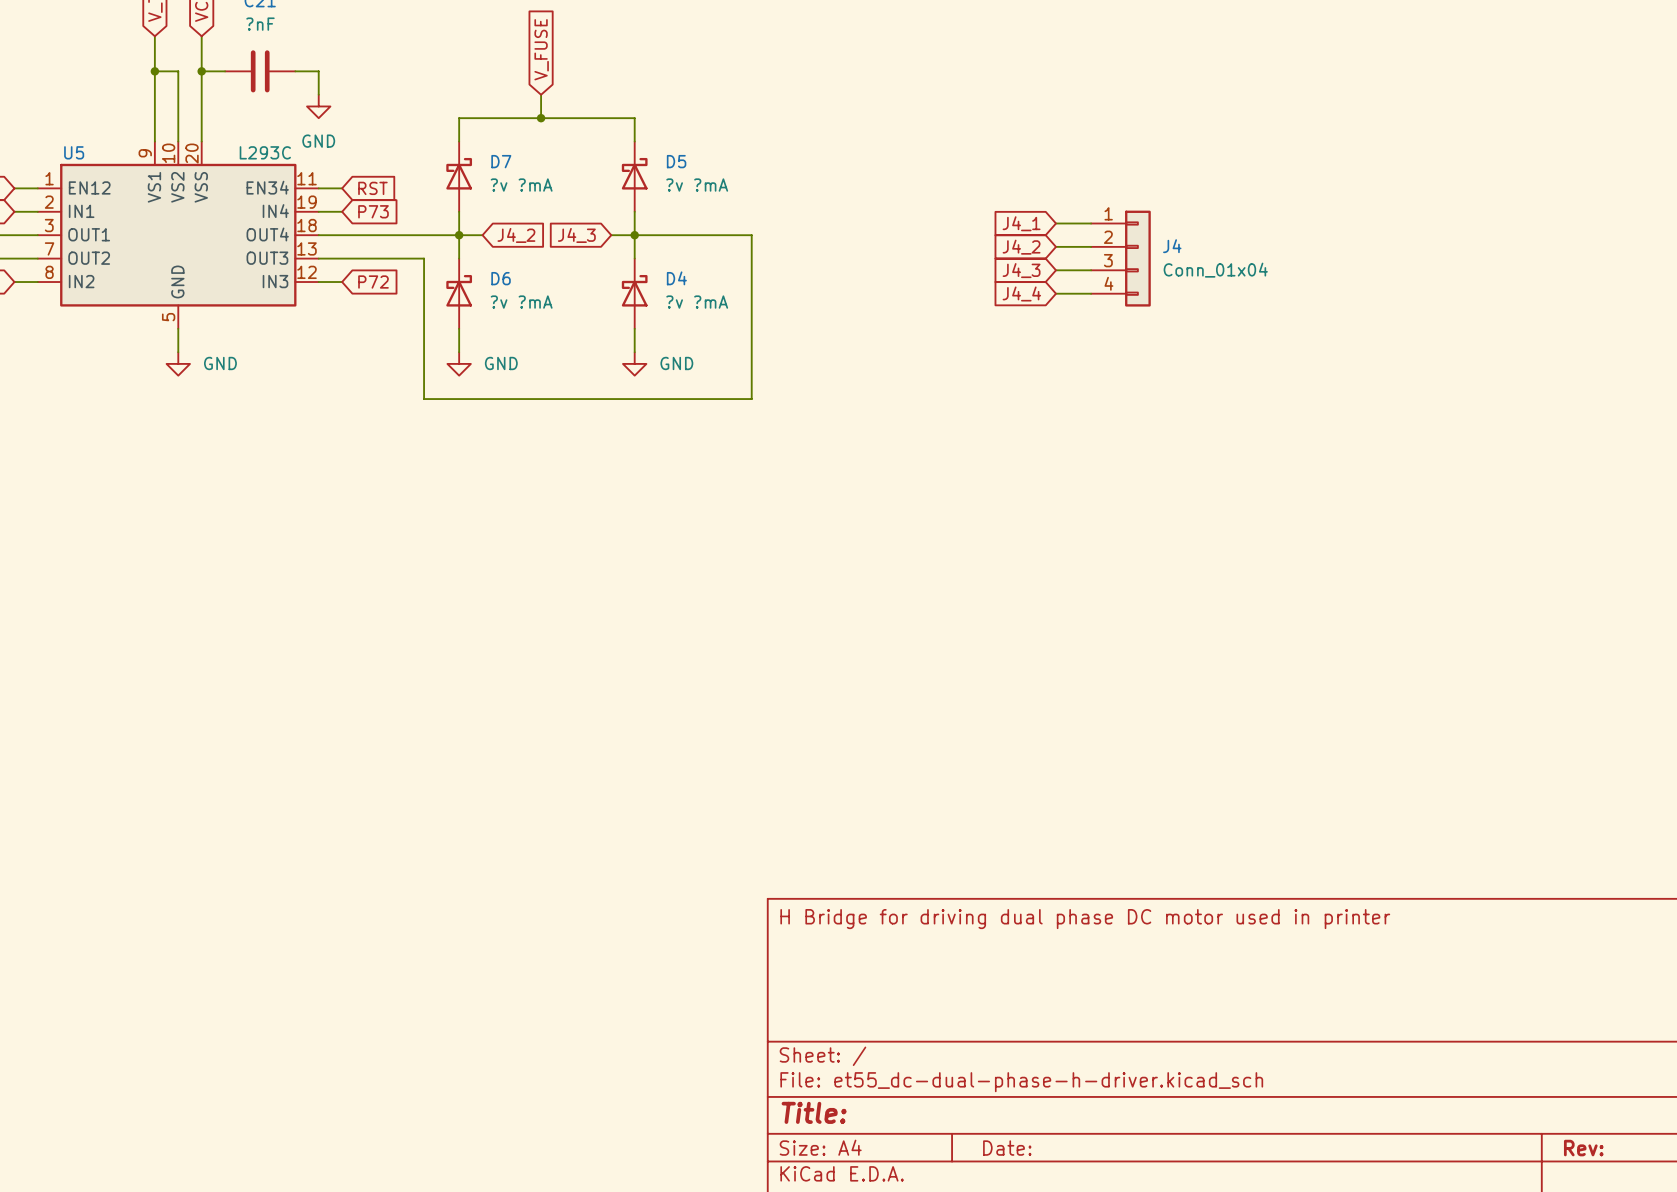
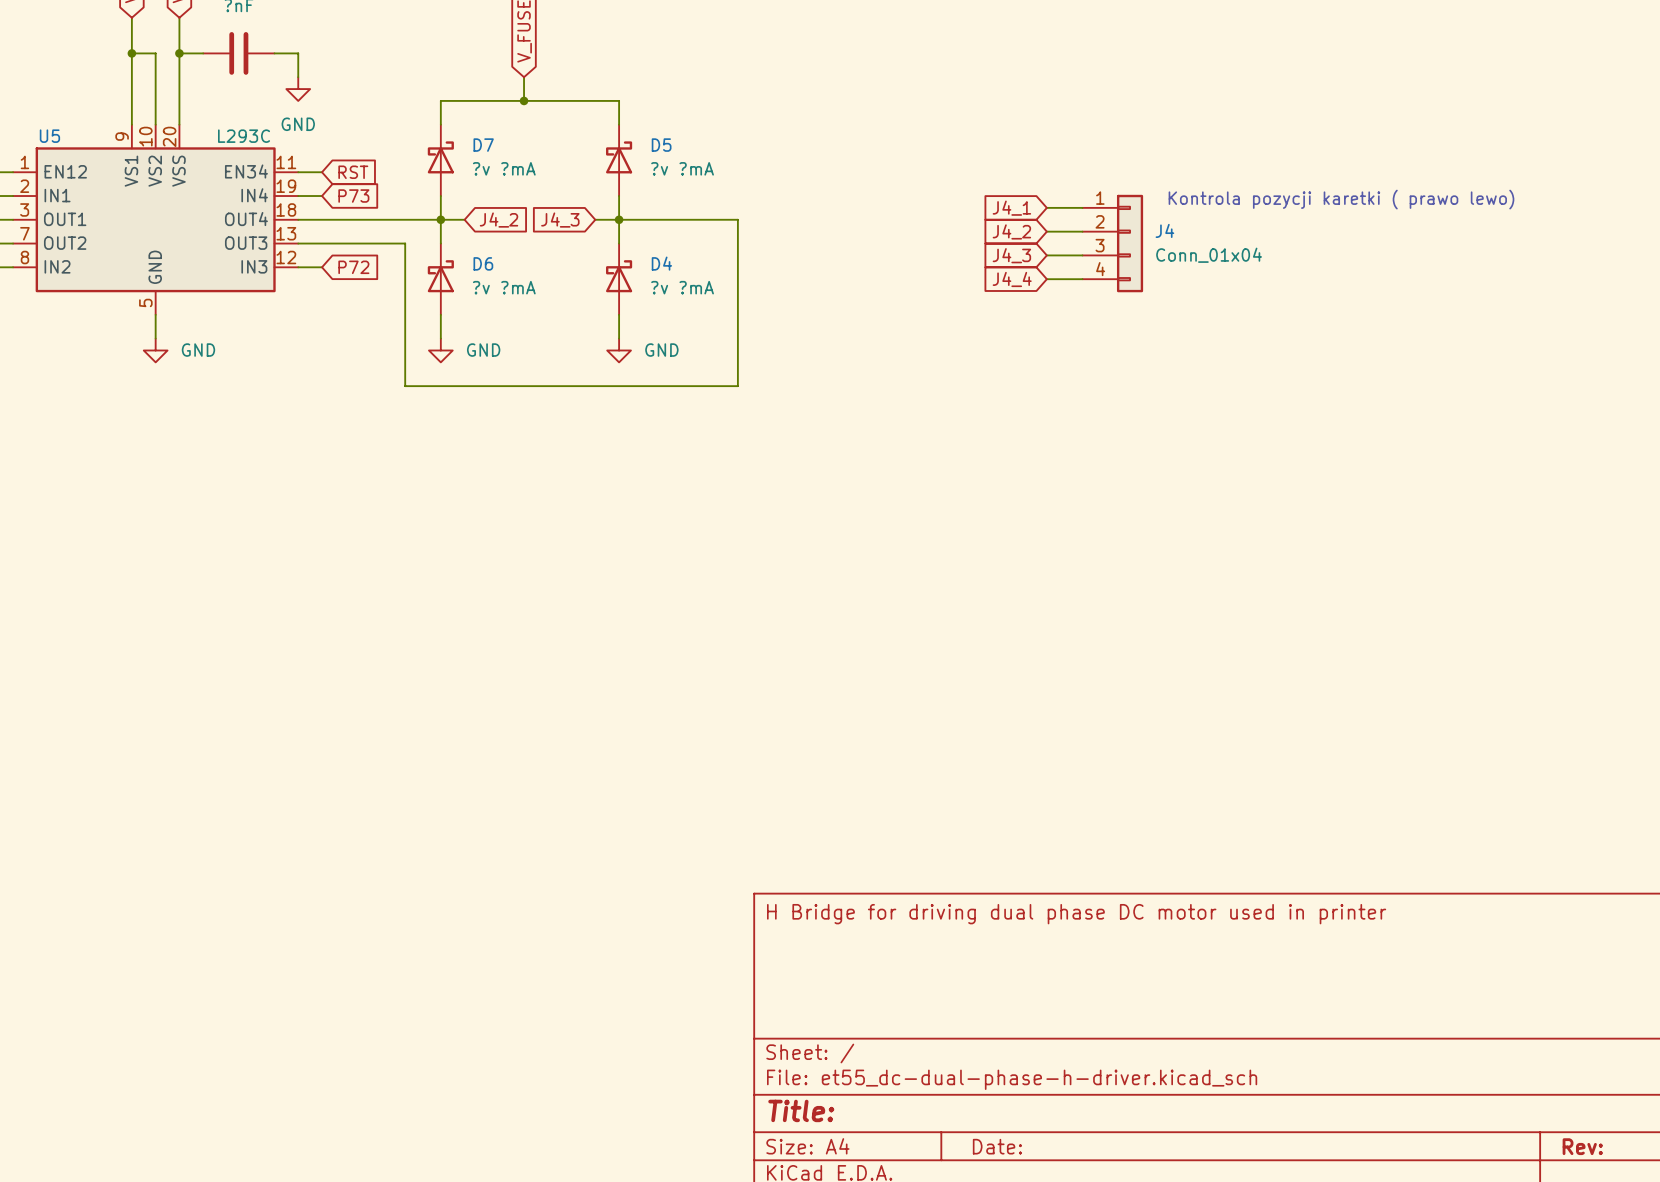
text: none -> Kontrola pozycji karetki ( prawo lewo) (1341, 199)

